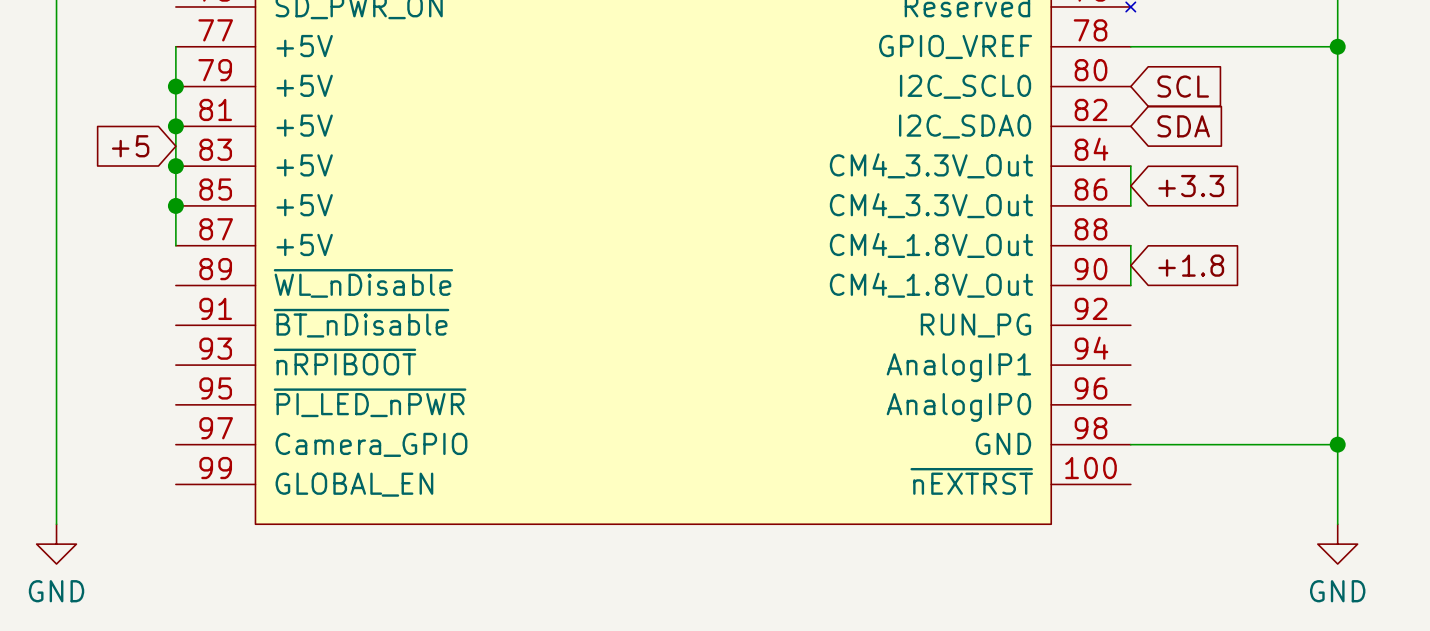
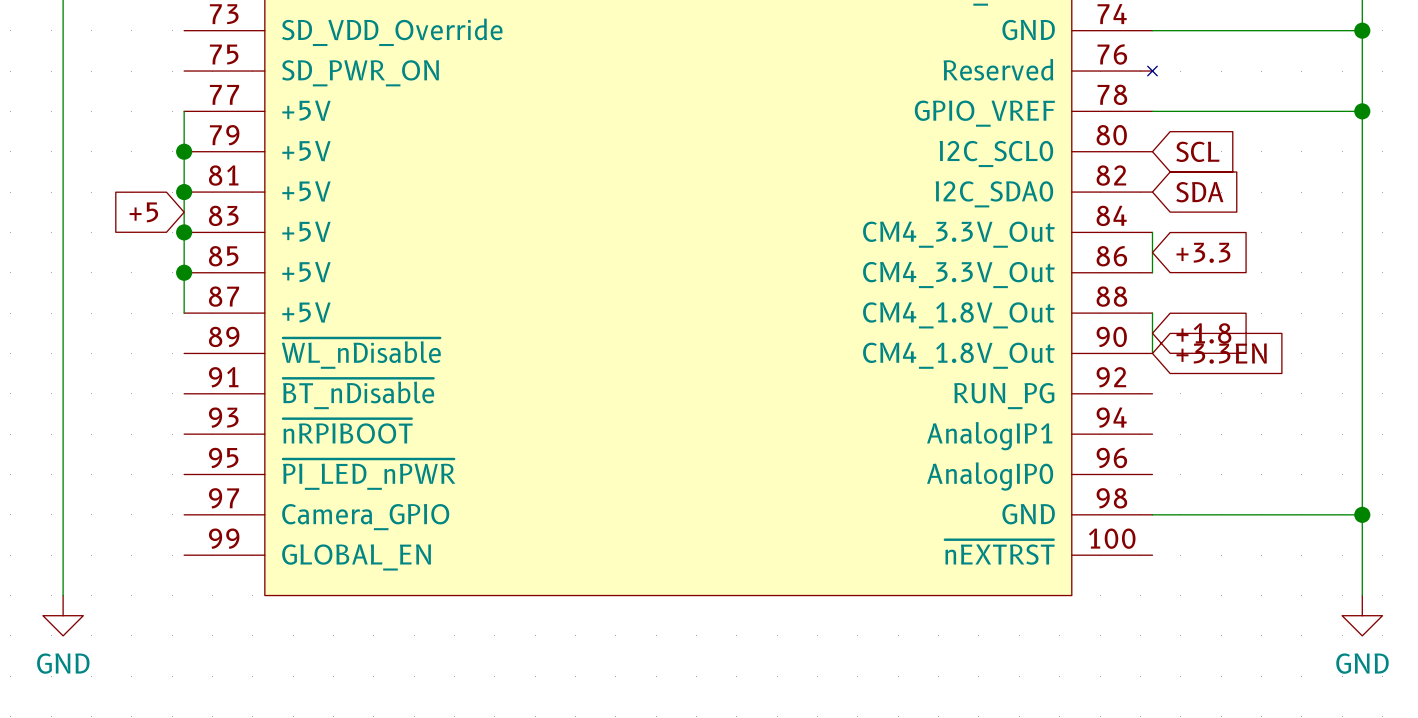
global label: none -> +3.3EN (1221, 353)

